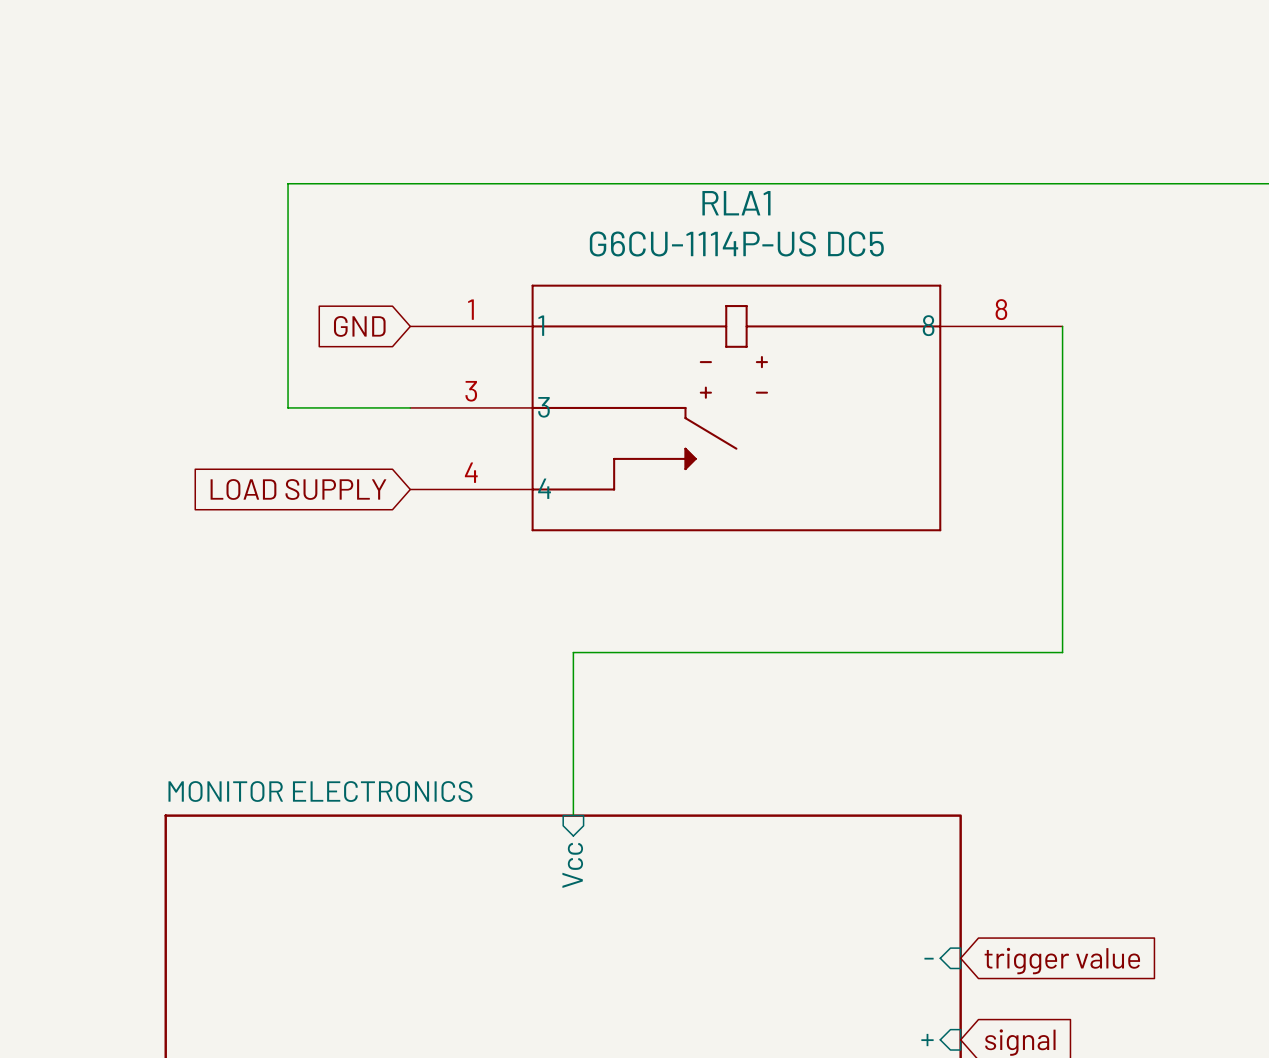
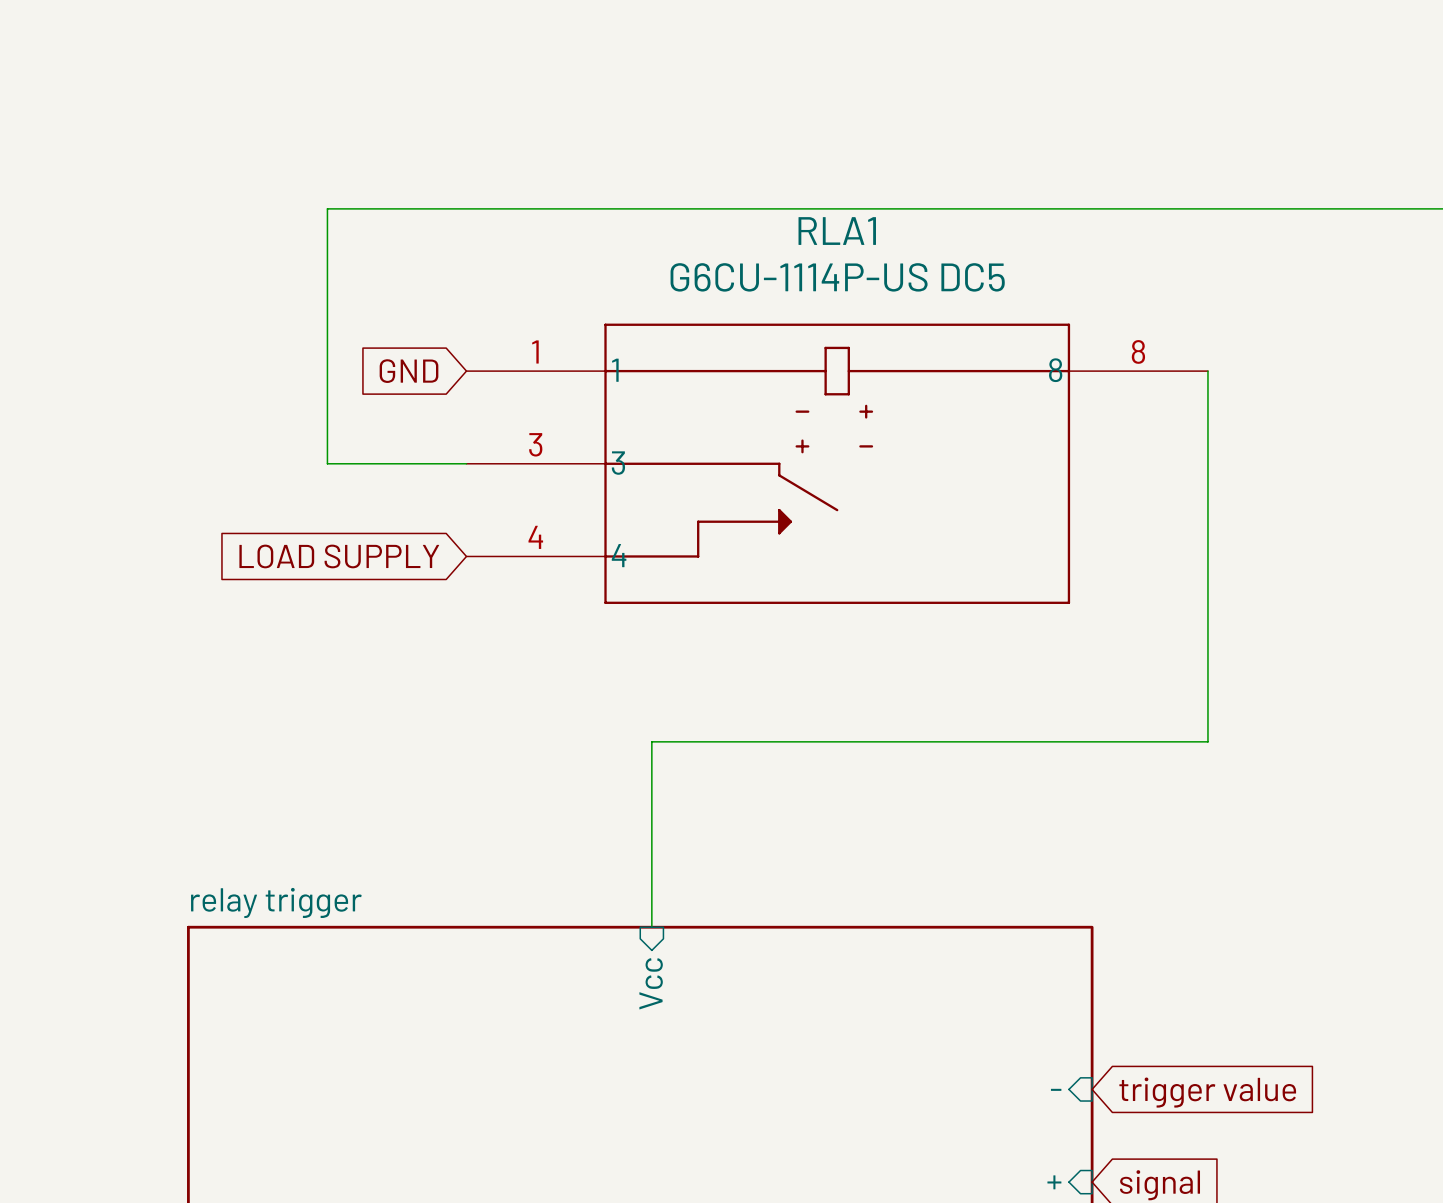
sheet MONITOR ELECTRONICS name: MONITOR ELECTRONICS (320, 791) -> relay trigger (276, 902)

